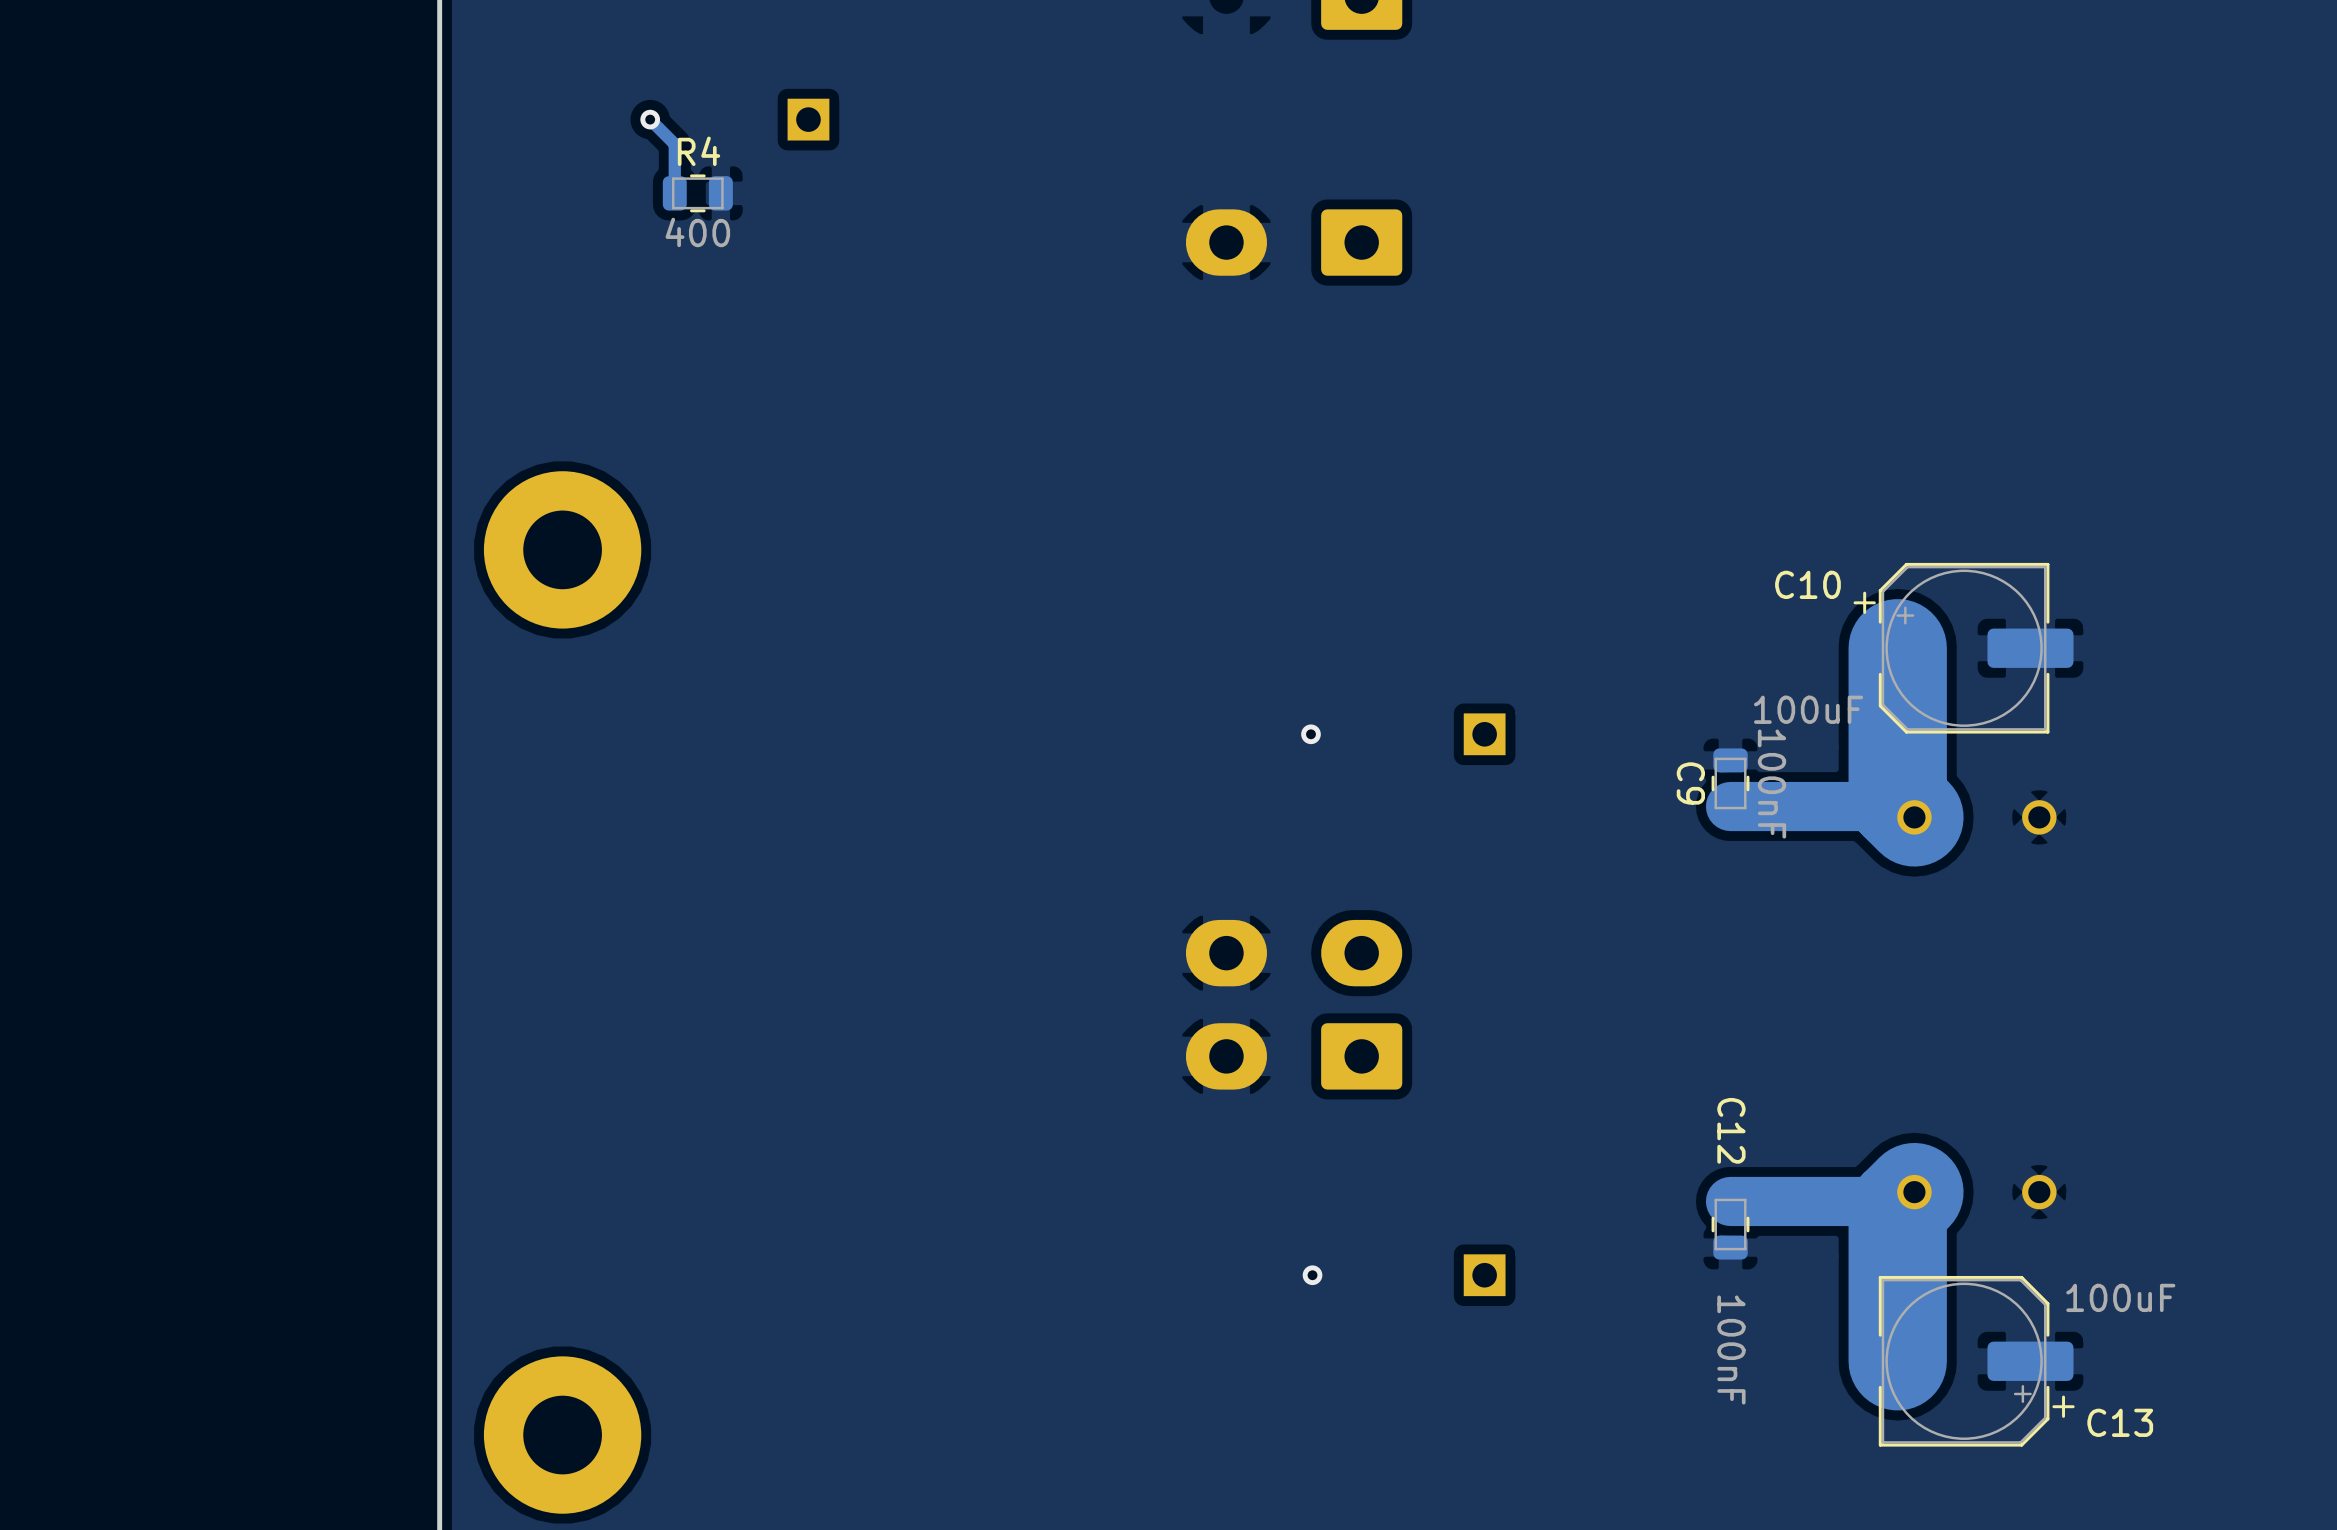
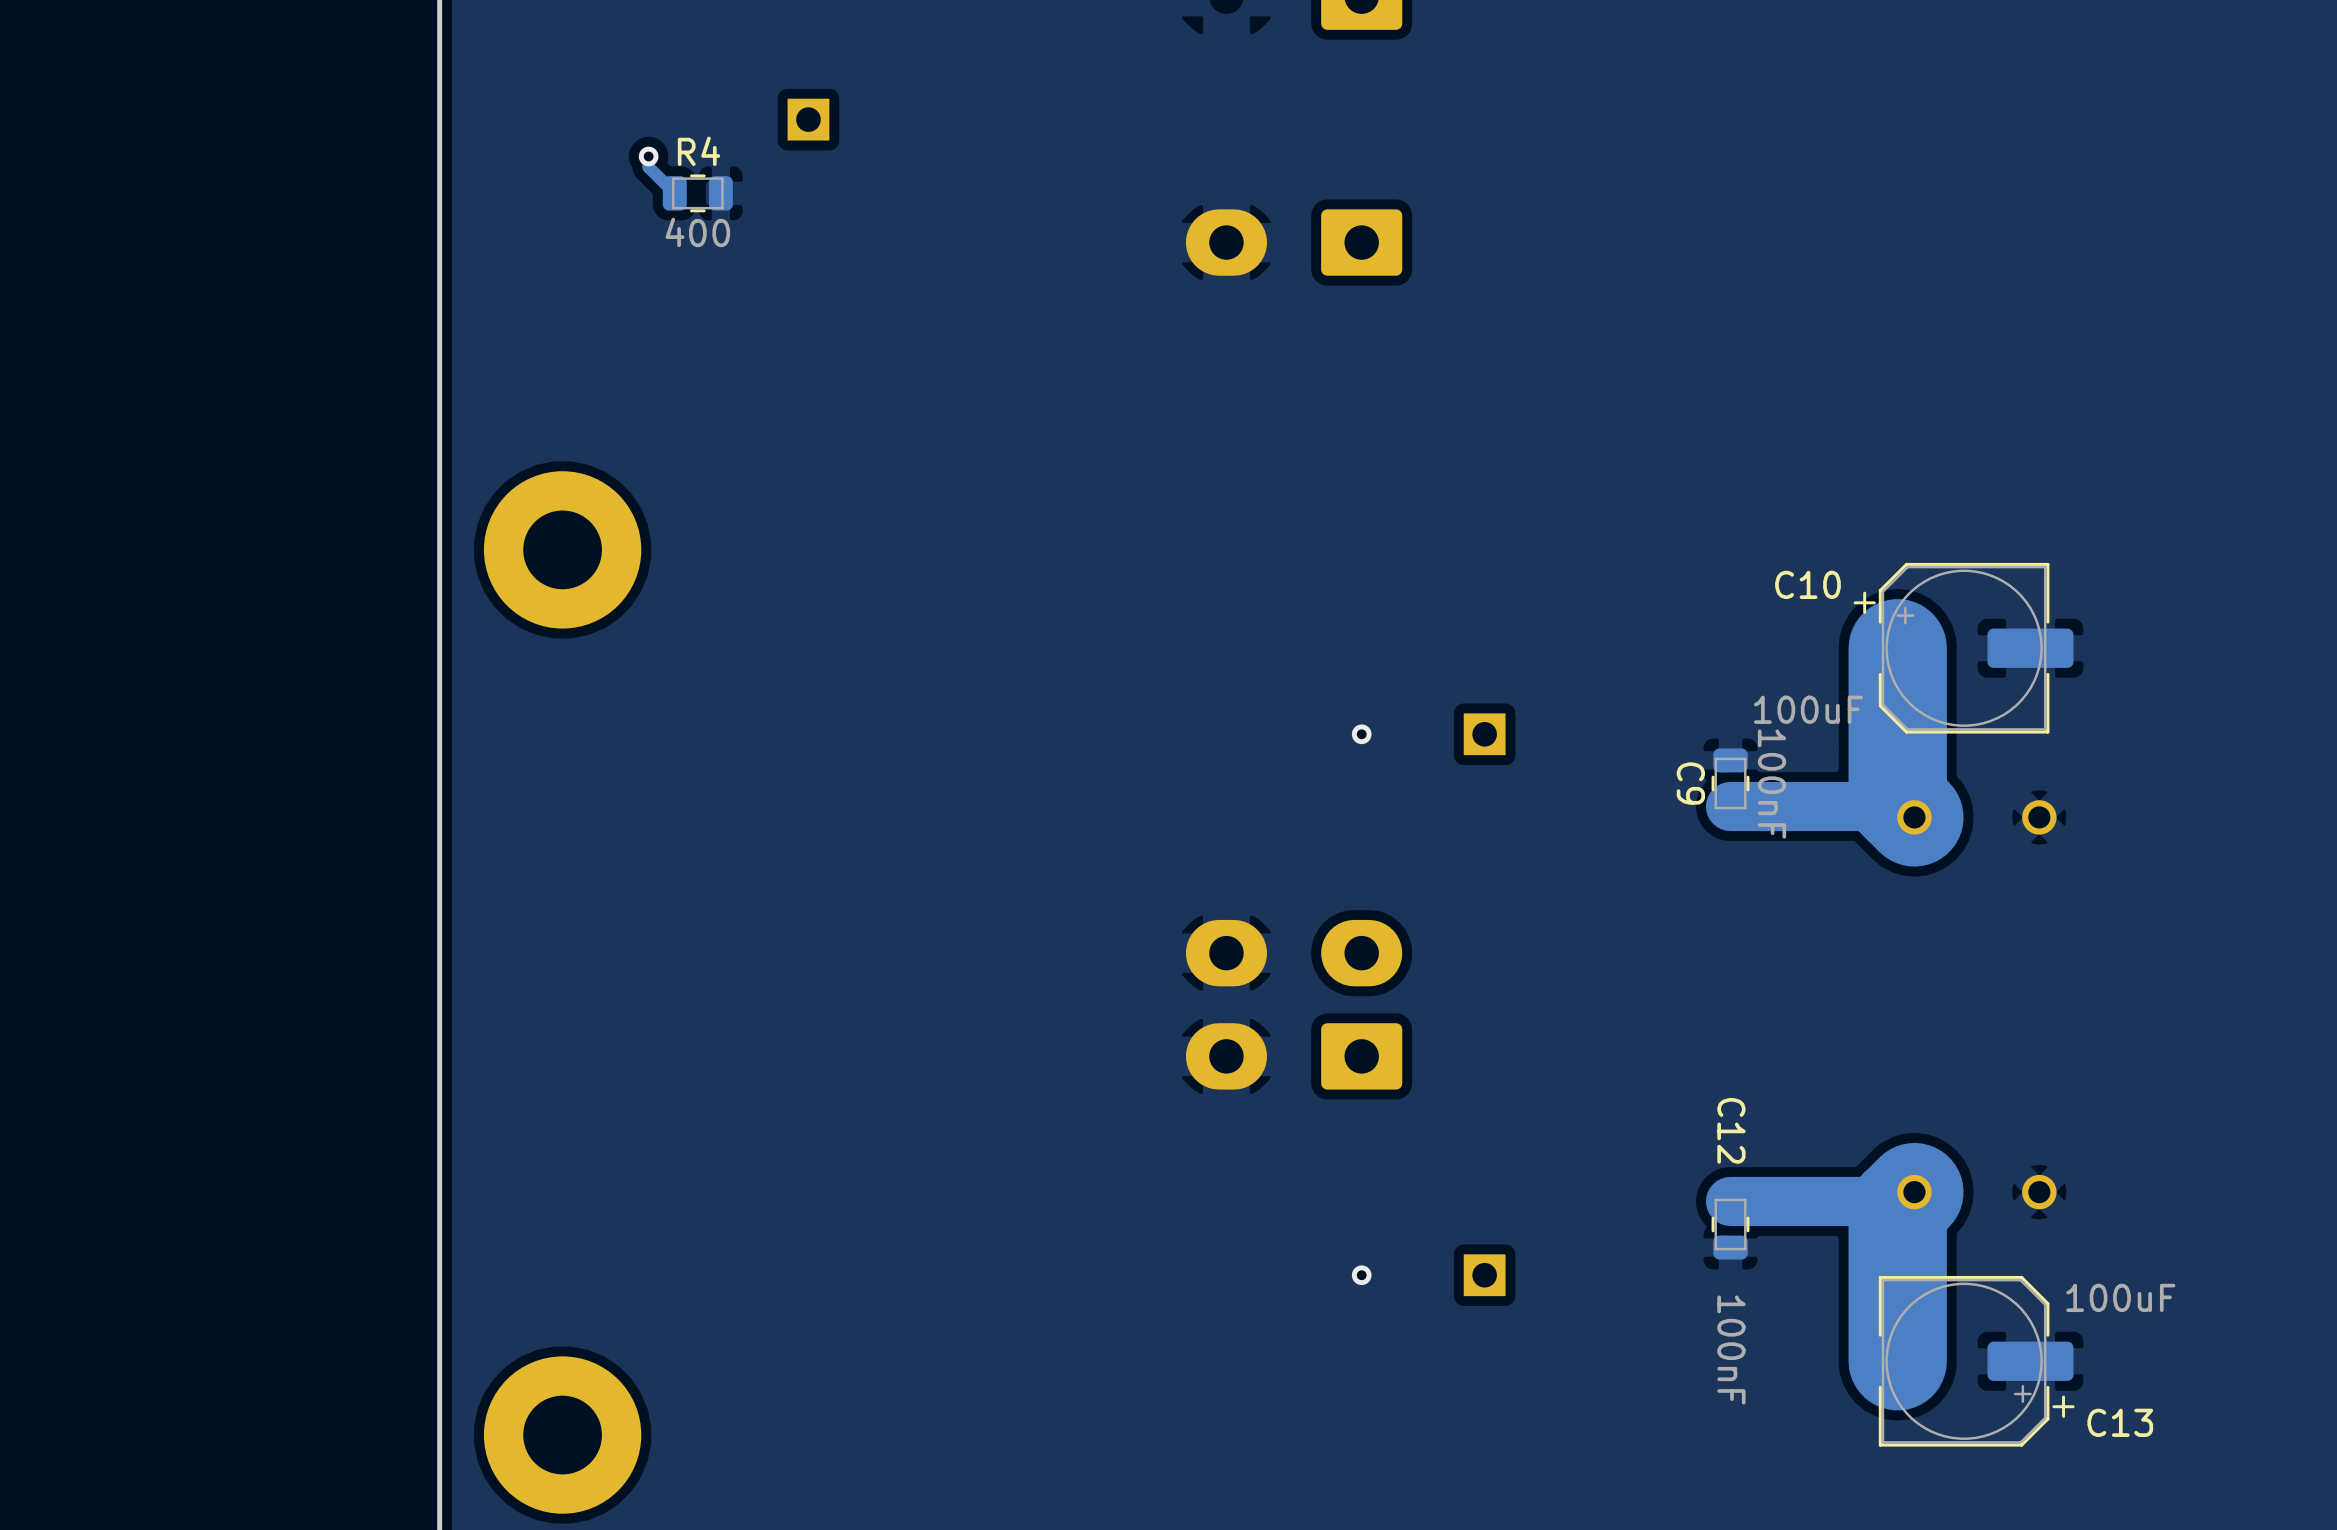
track: (650, 119) (674, 144) (674, 193) -> (648, 156) (648, 167) (674, 193)
via position: (650, 119) -> (648, 156)
via position: (1310, 734) -> (1361, 734)
via position: (1312, 1275) -> (1361, 1275)

